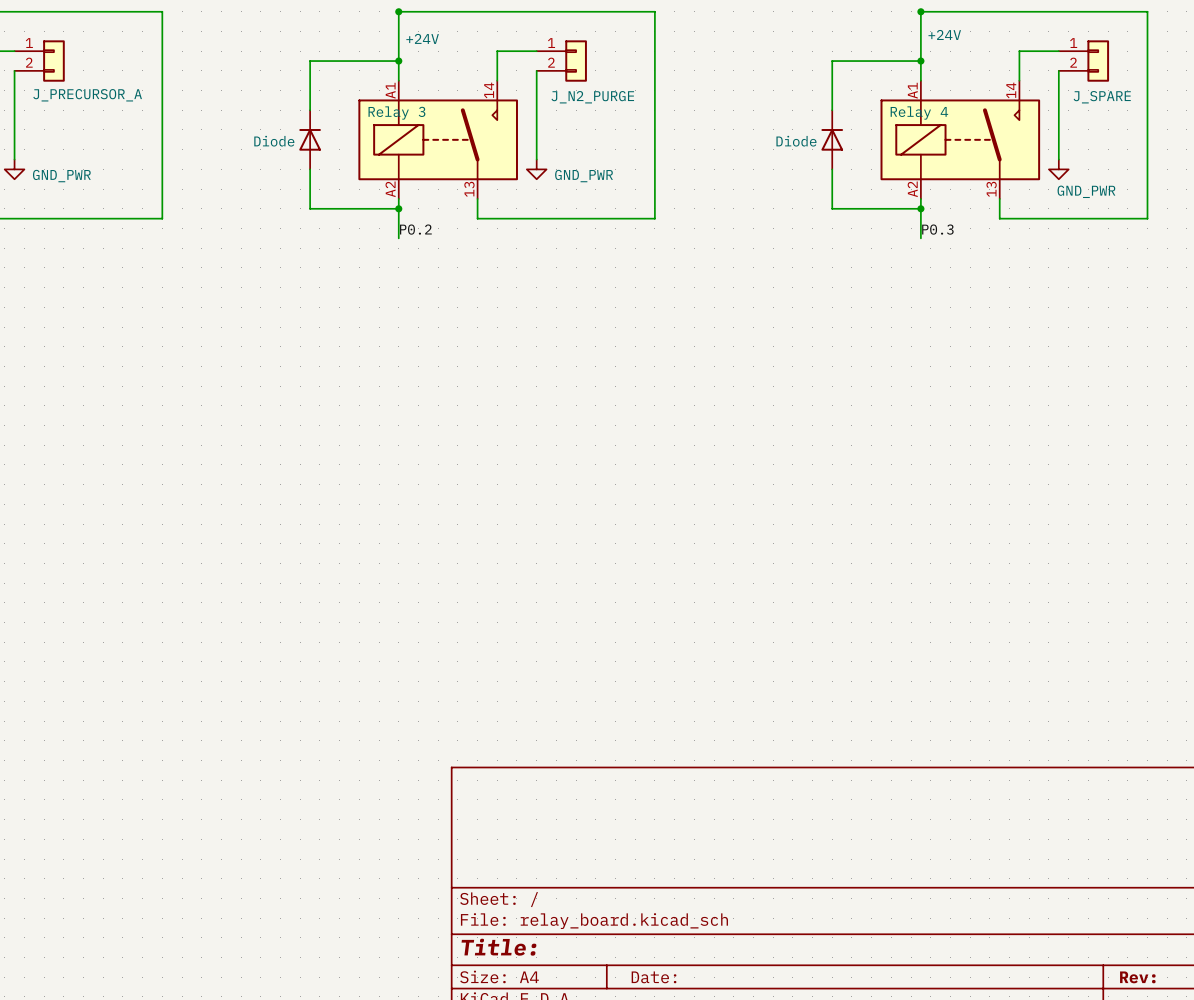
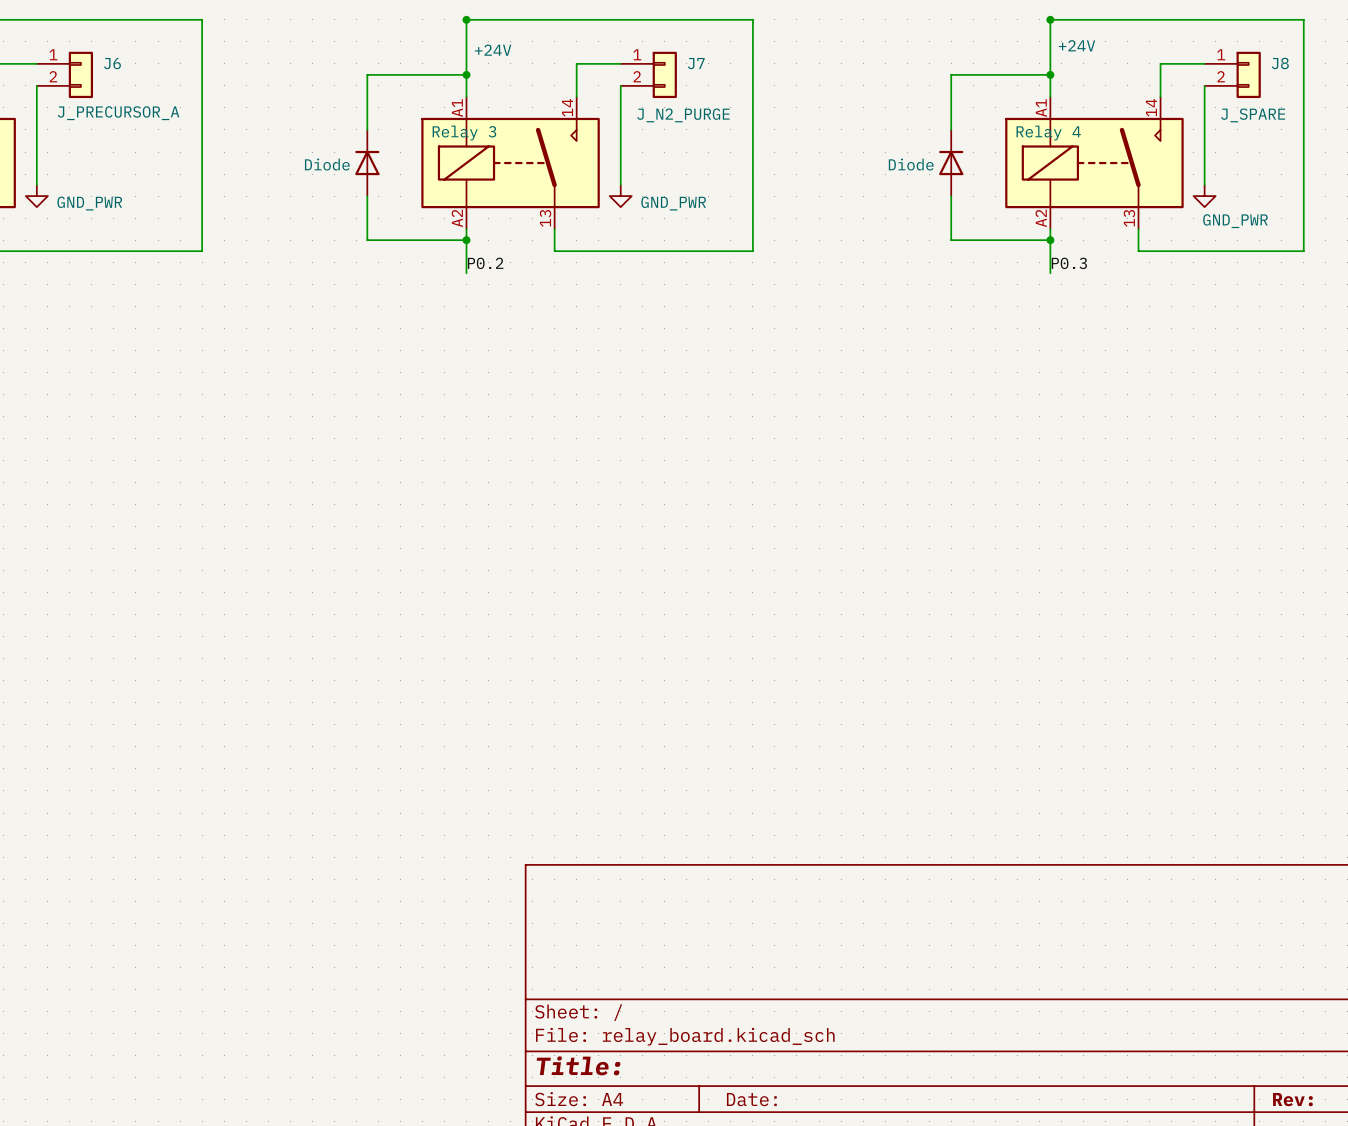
J6 name: none -> J6 (112, 63)
J7 name: none -> J7 (696, 63)
J8 name: none -> J8 (1280, 63)

